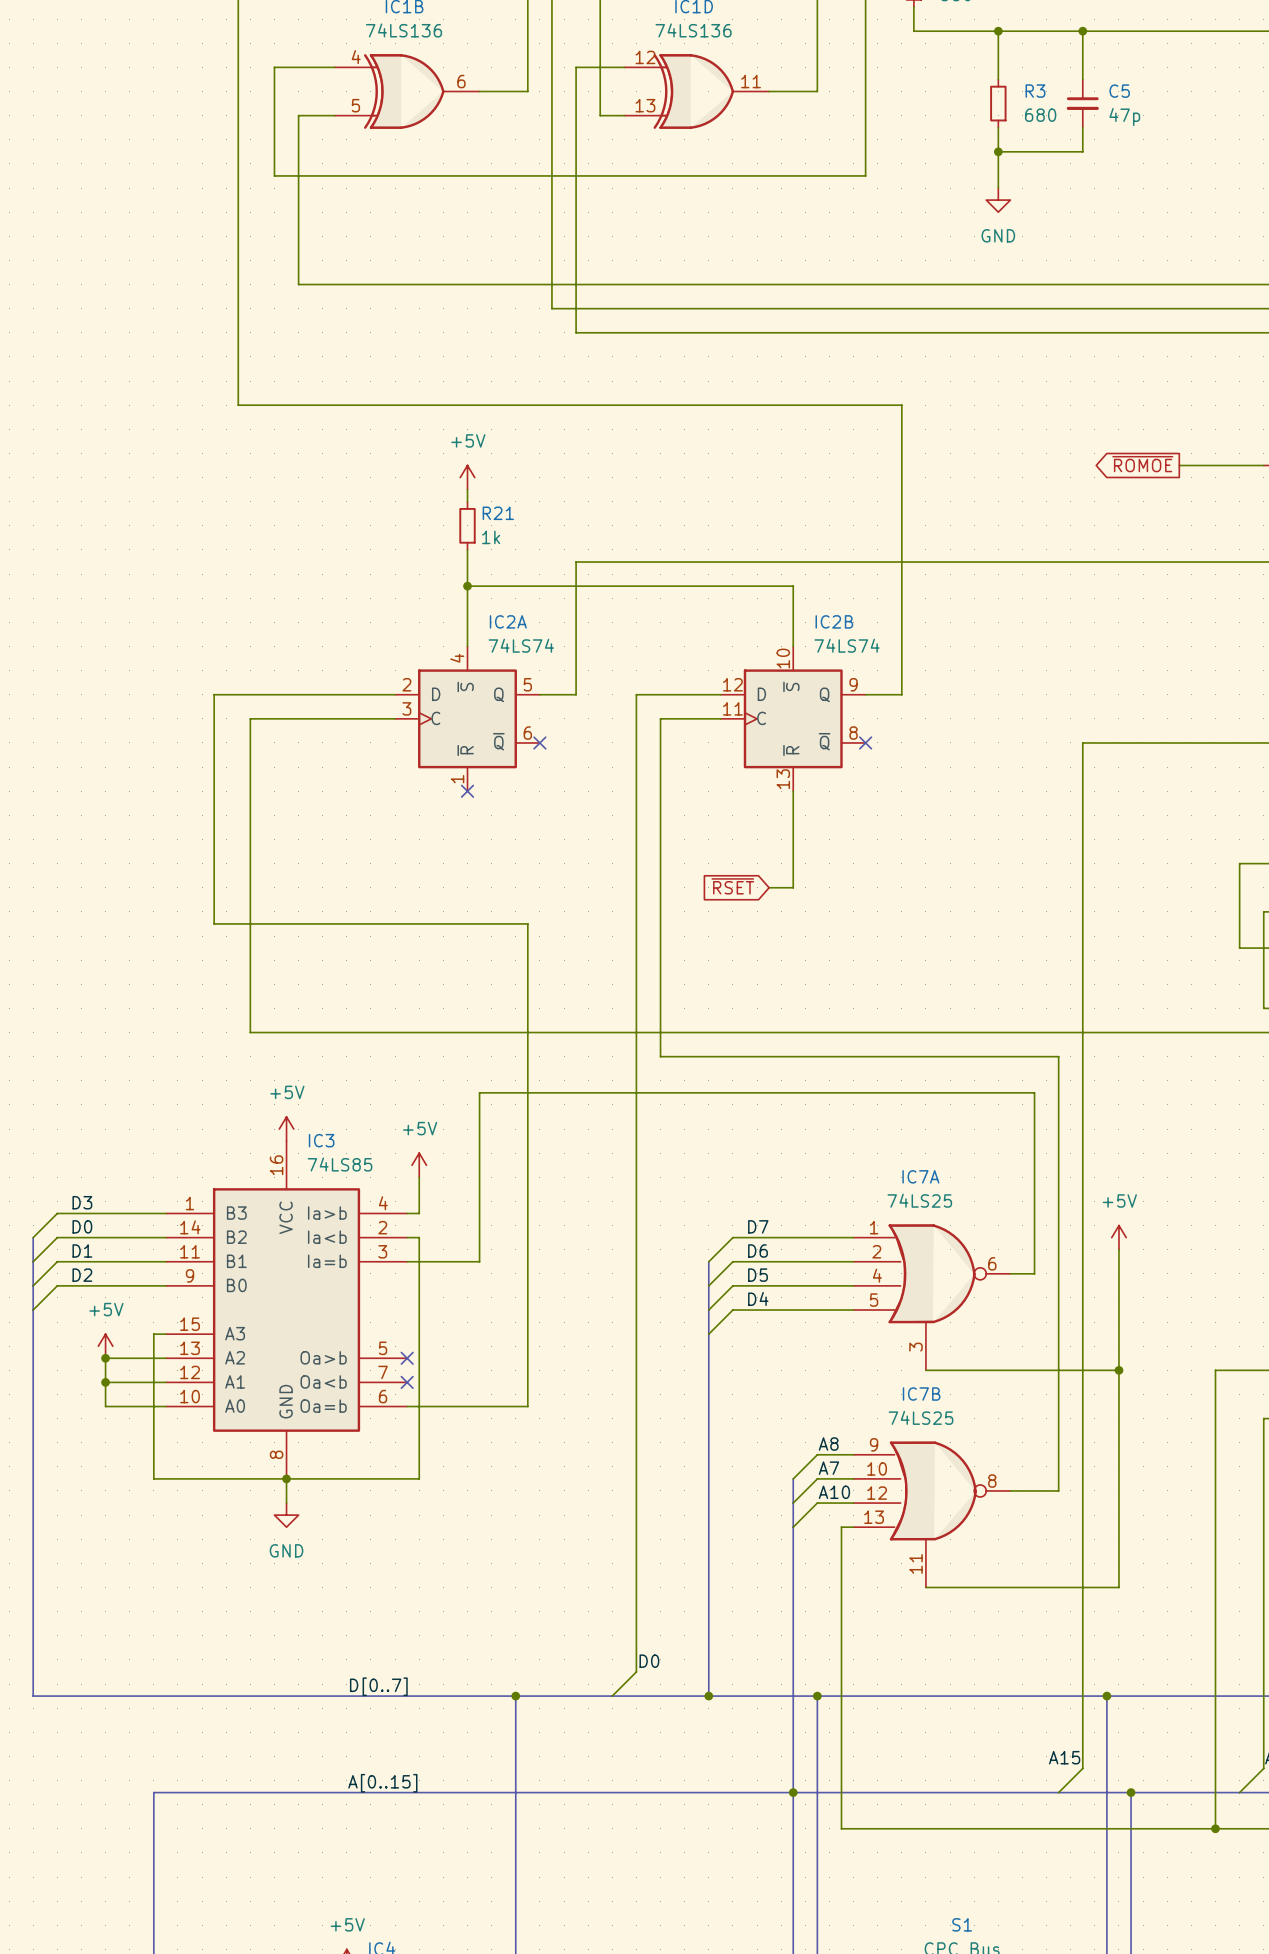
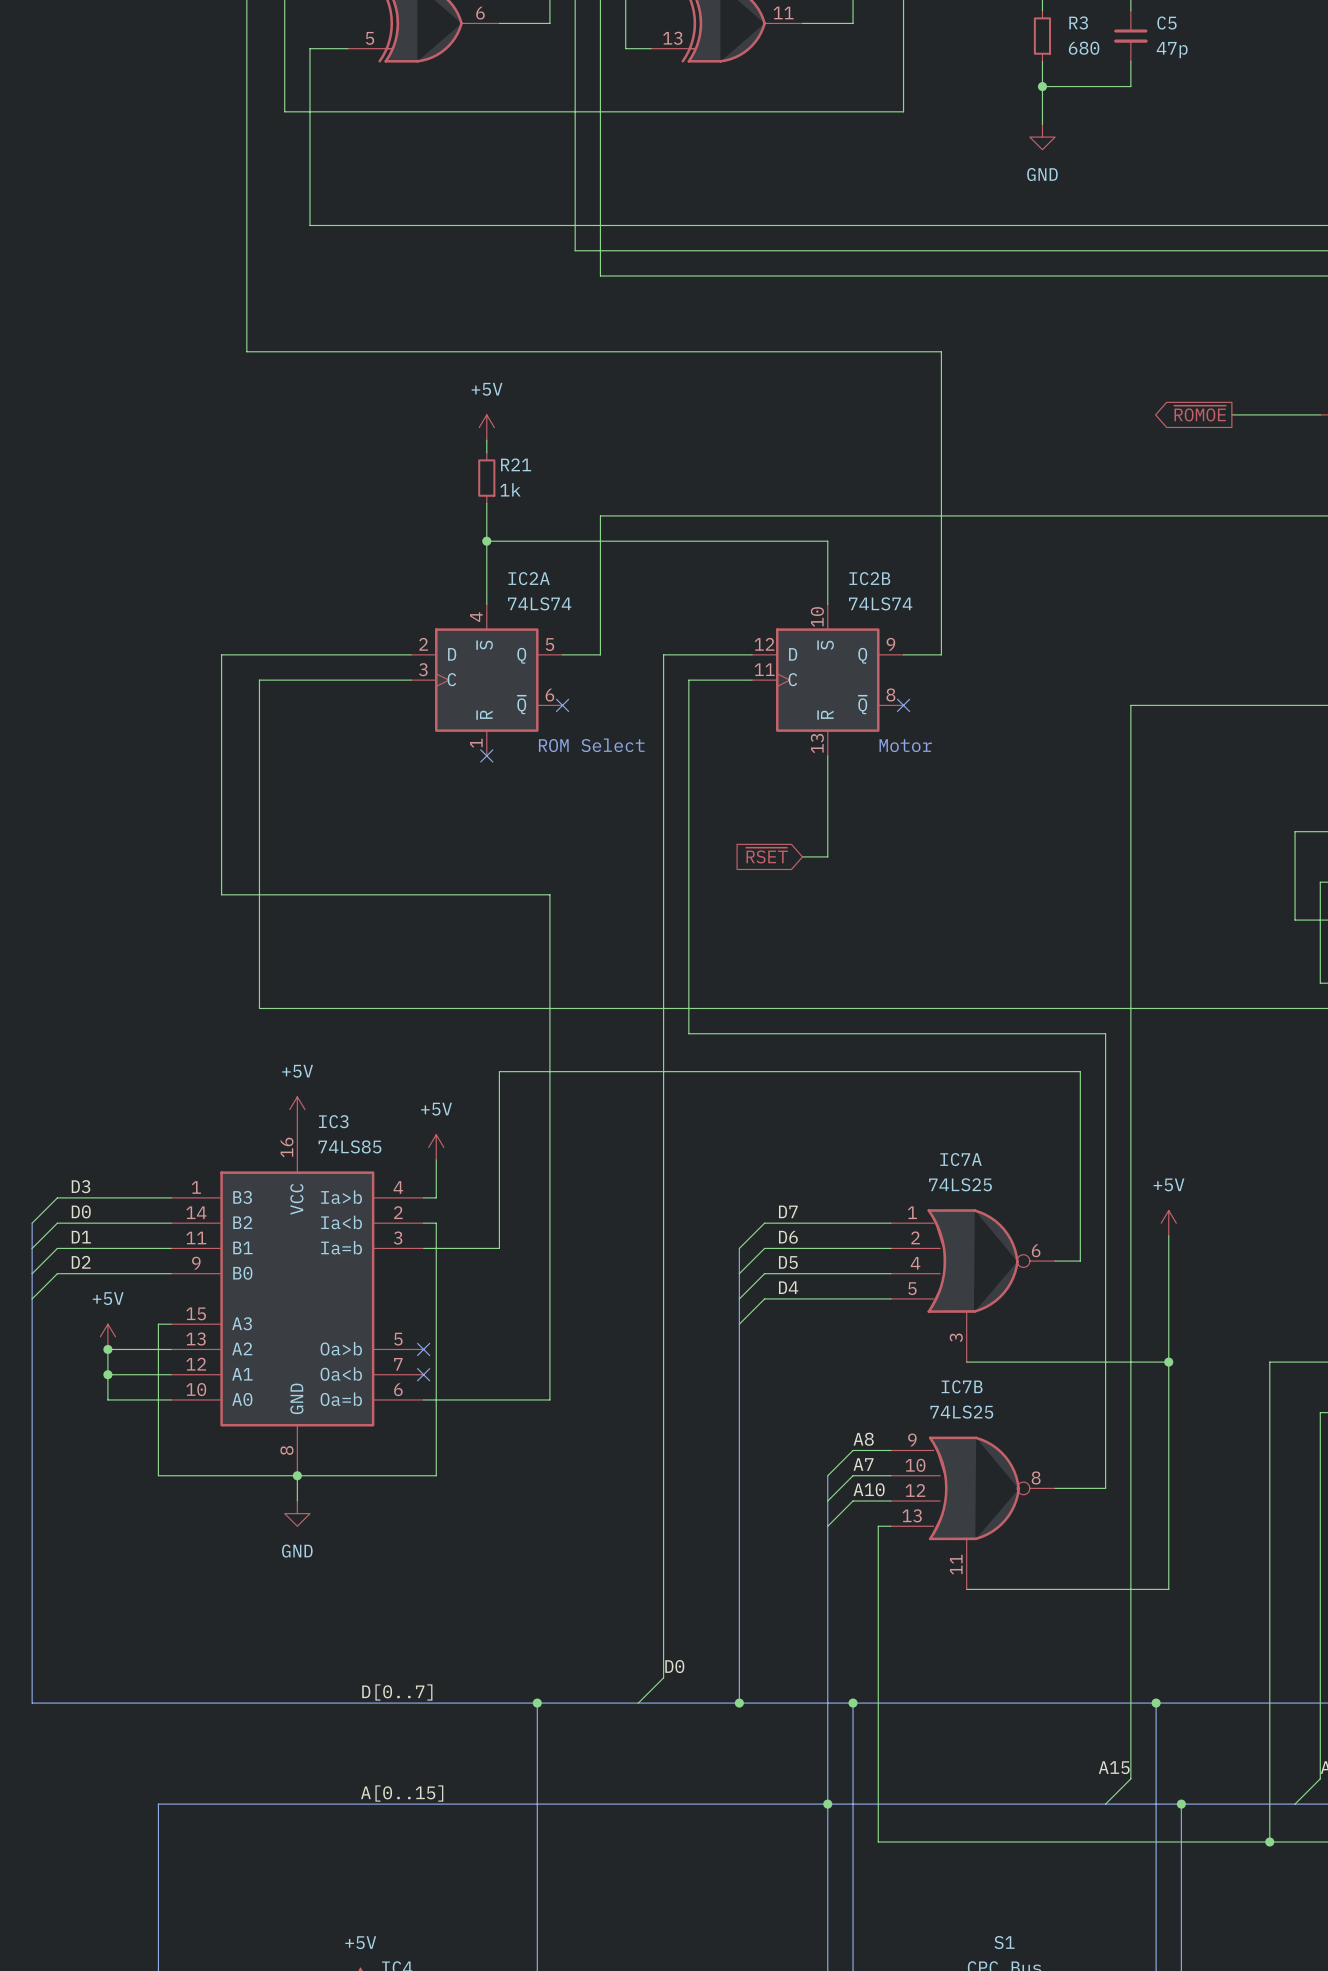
text: none -> ROM Select (591, 745)
text: none -> Motor (905, 745)

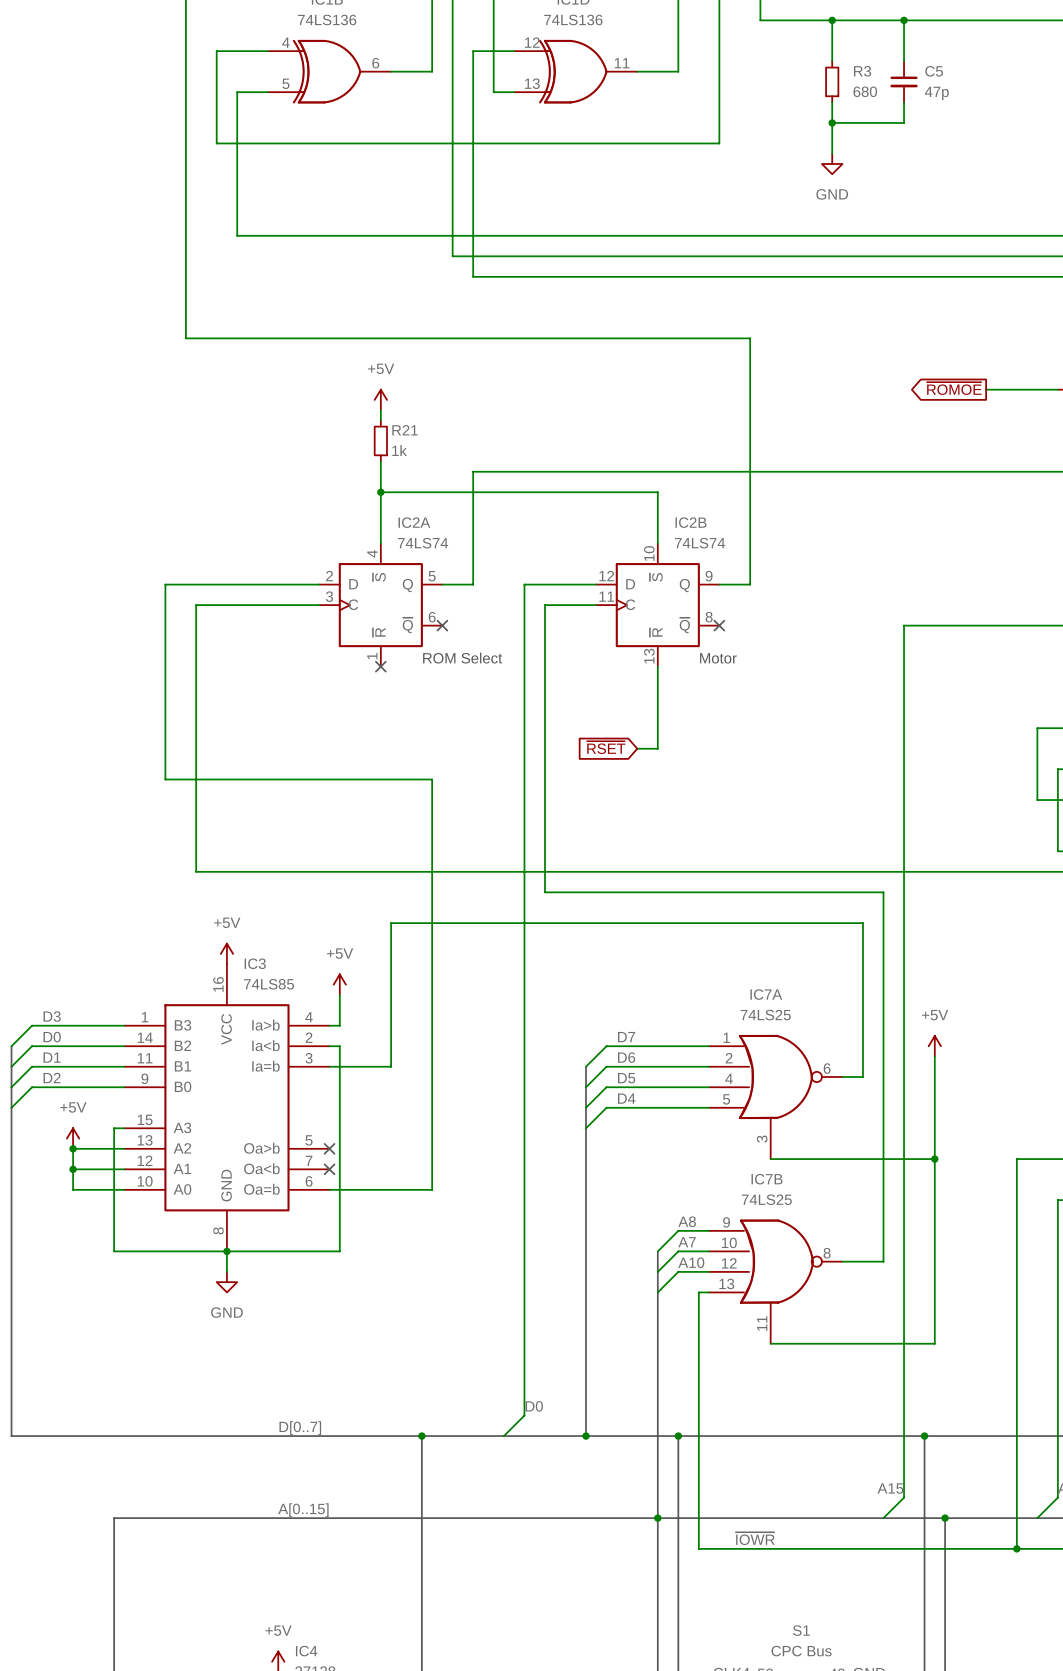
label: none -> ~{IOWR} (755, 1538)

